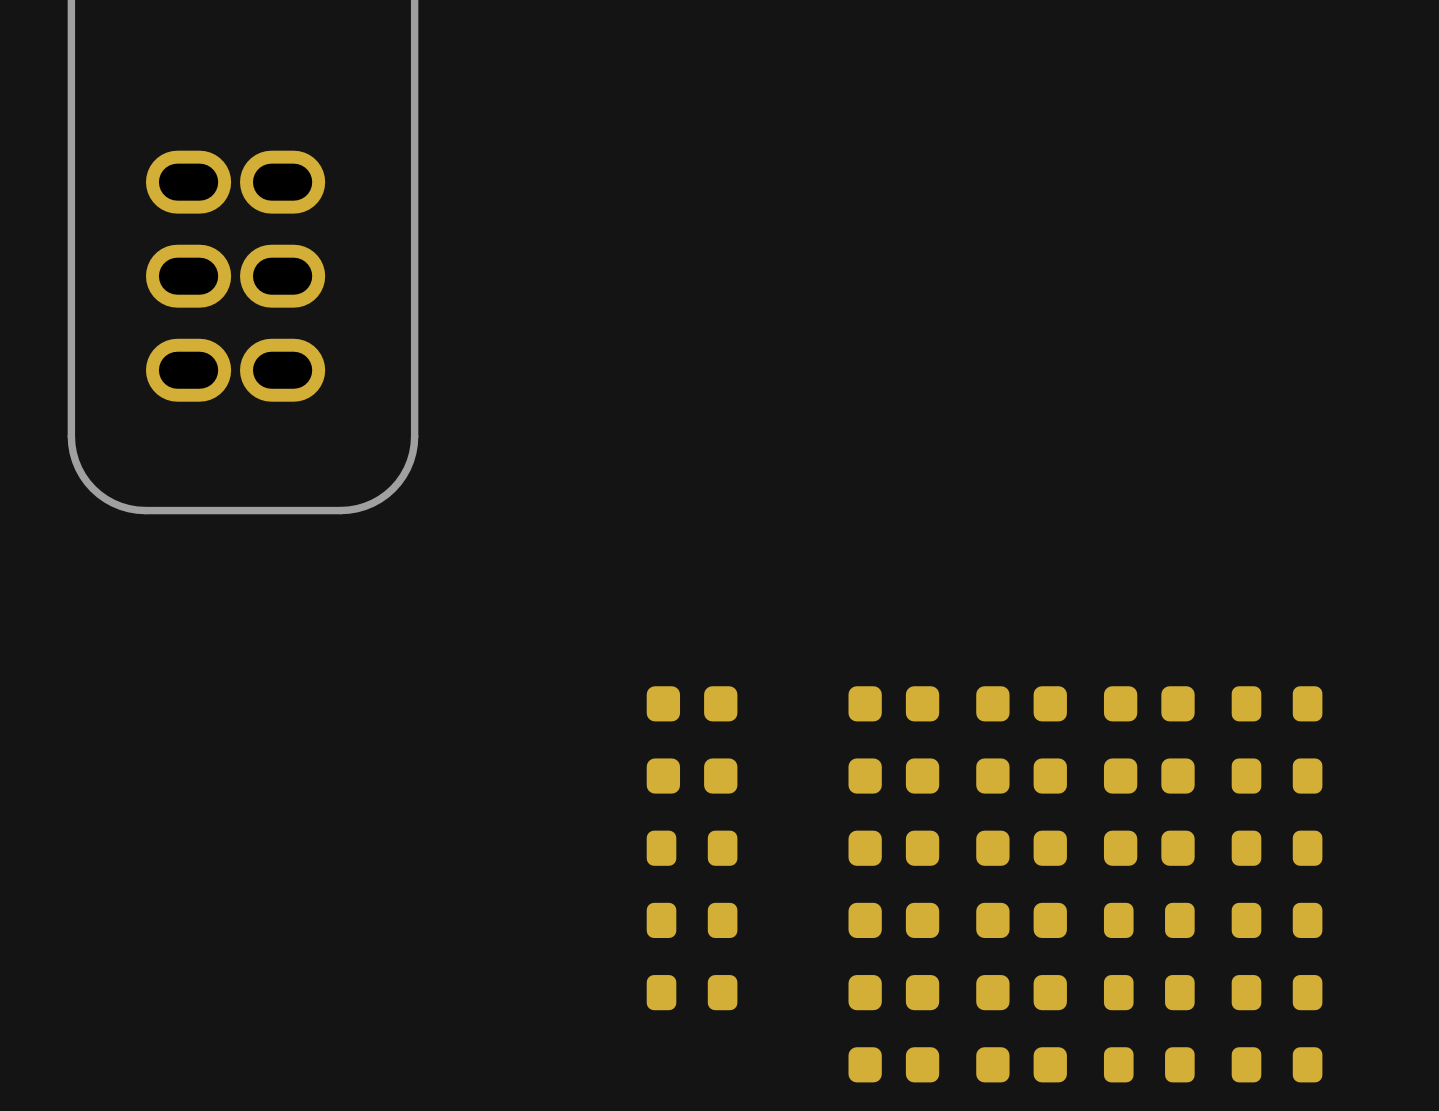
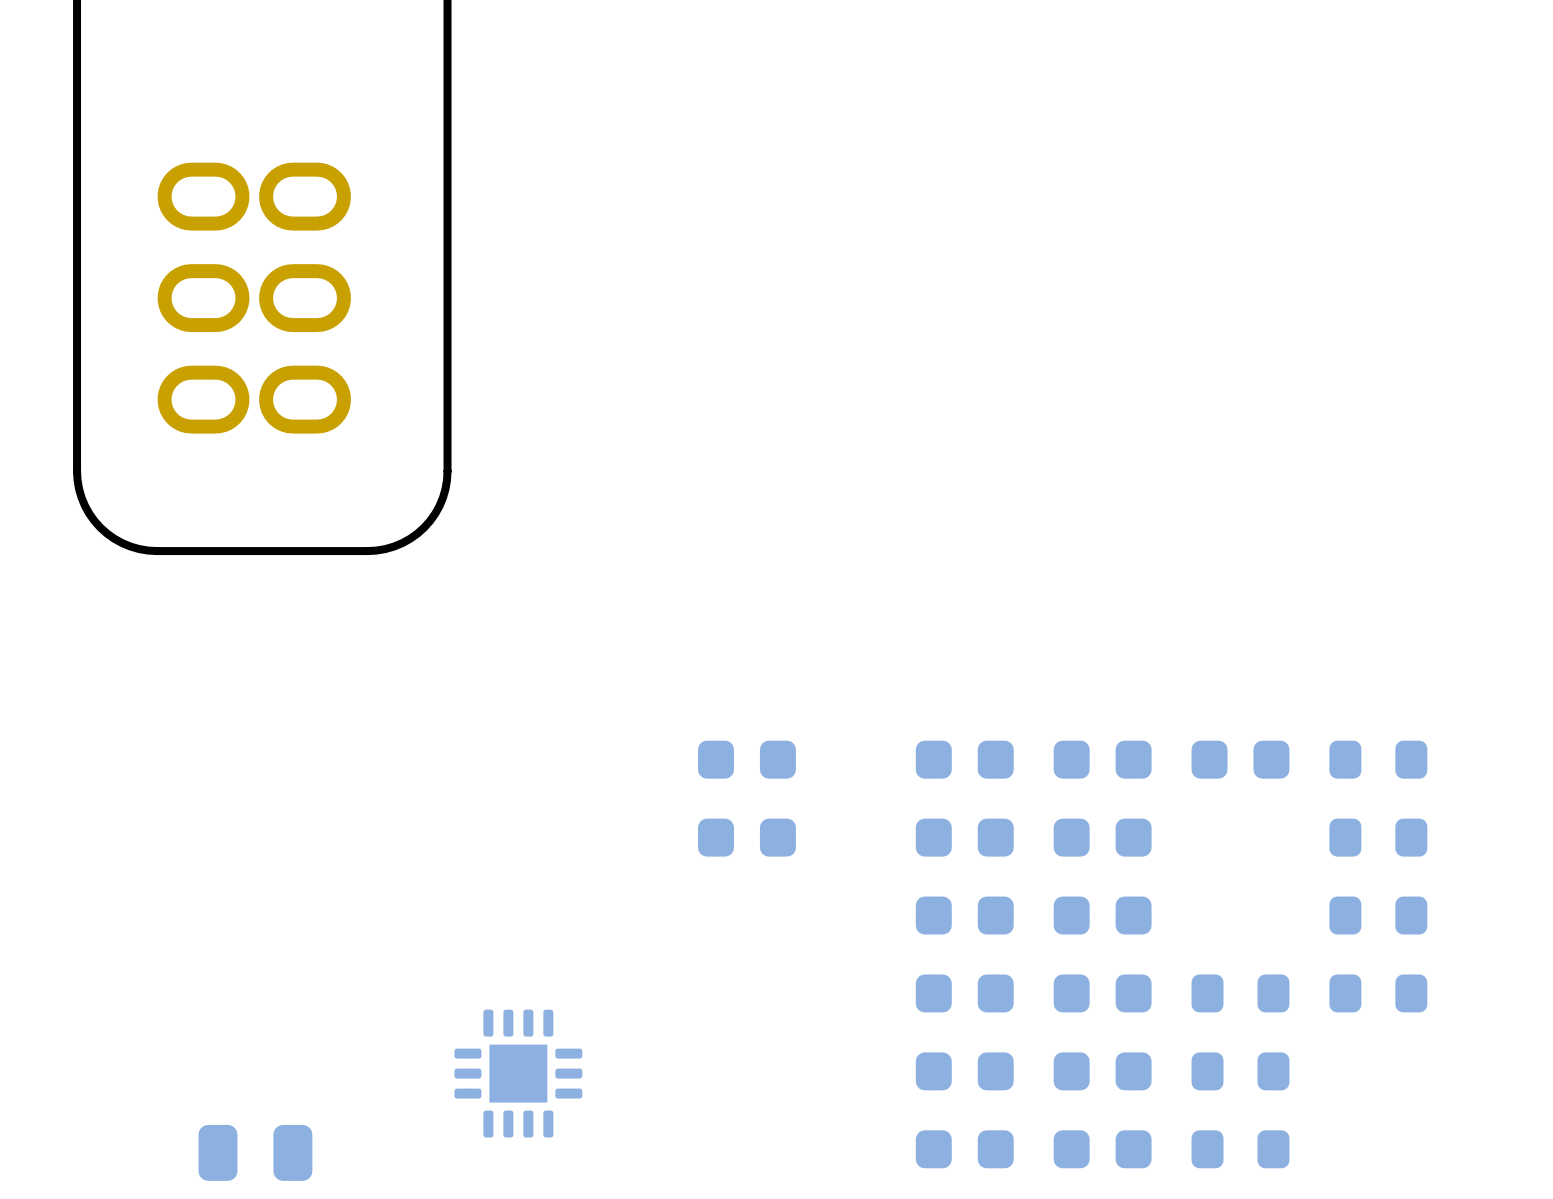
part: (1149, 776) -> none
part: (692, 848) -> none
part: (1149, 848) -> none
part: (692, 920) -> none
part: (692, 992) -> none
part: (1277, 992) -> none
part: none -> (518, 1073)
part: (1277, 1064) -> none
part: none -> (255, 1152)

